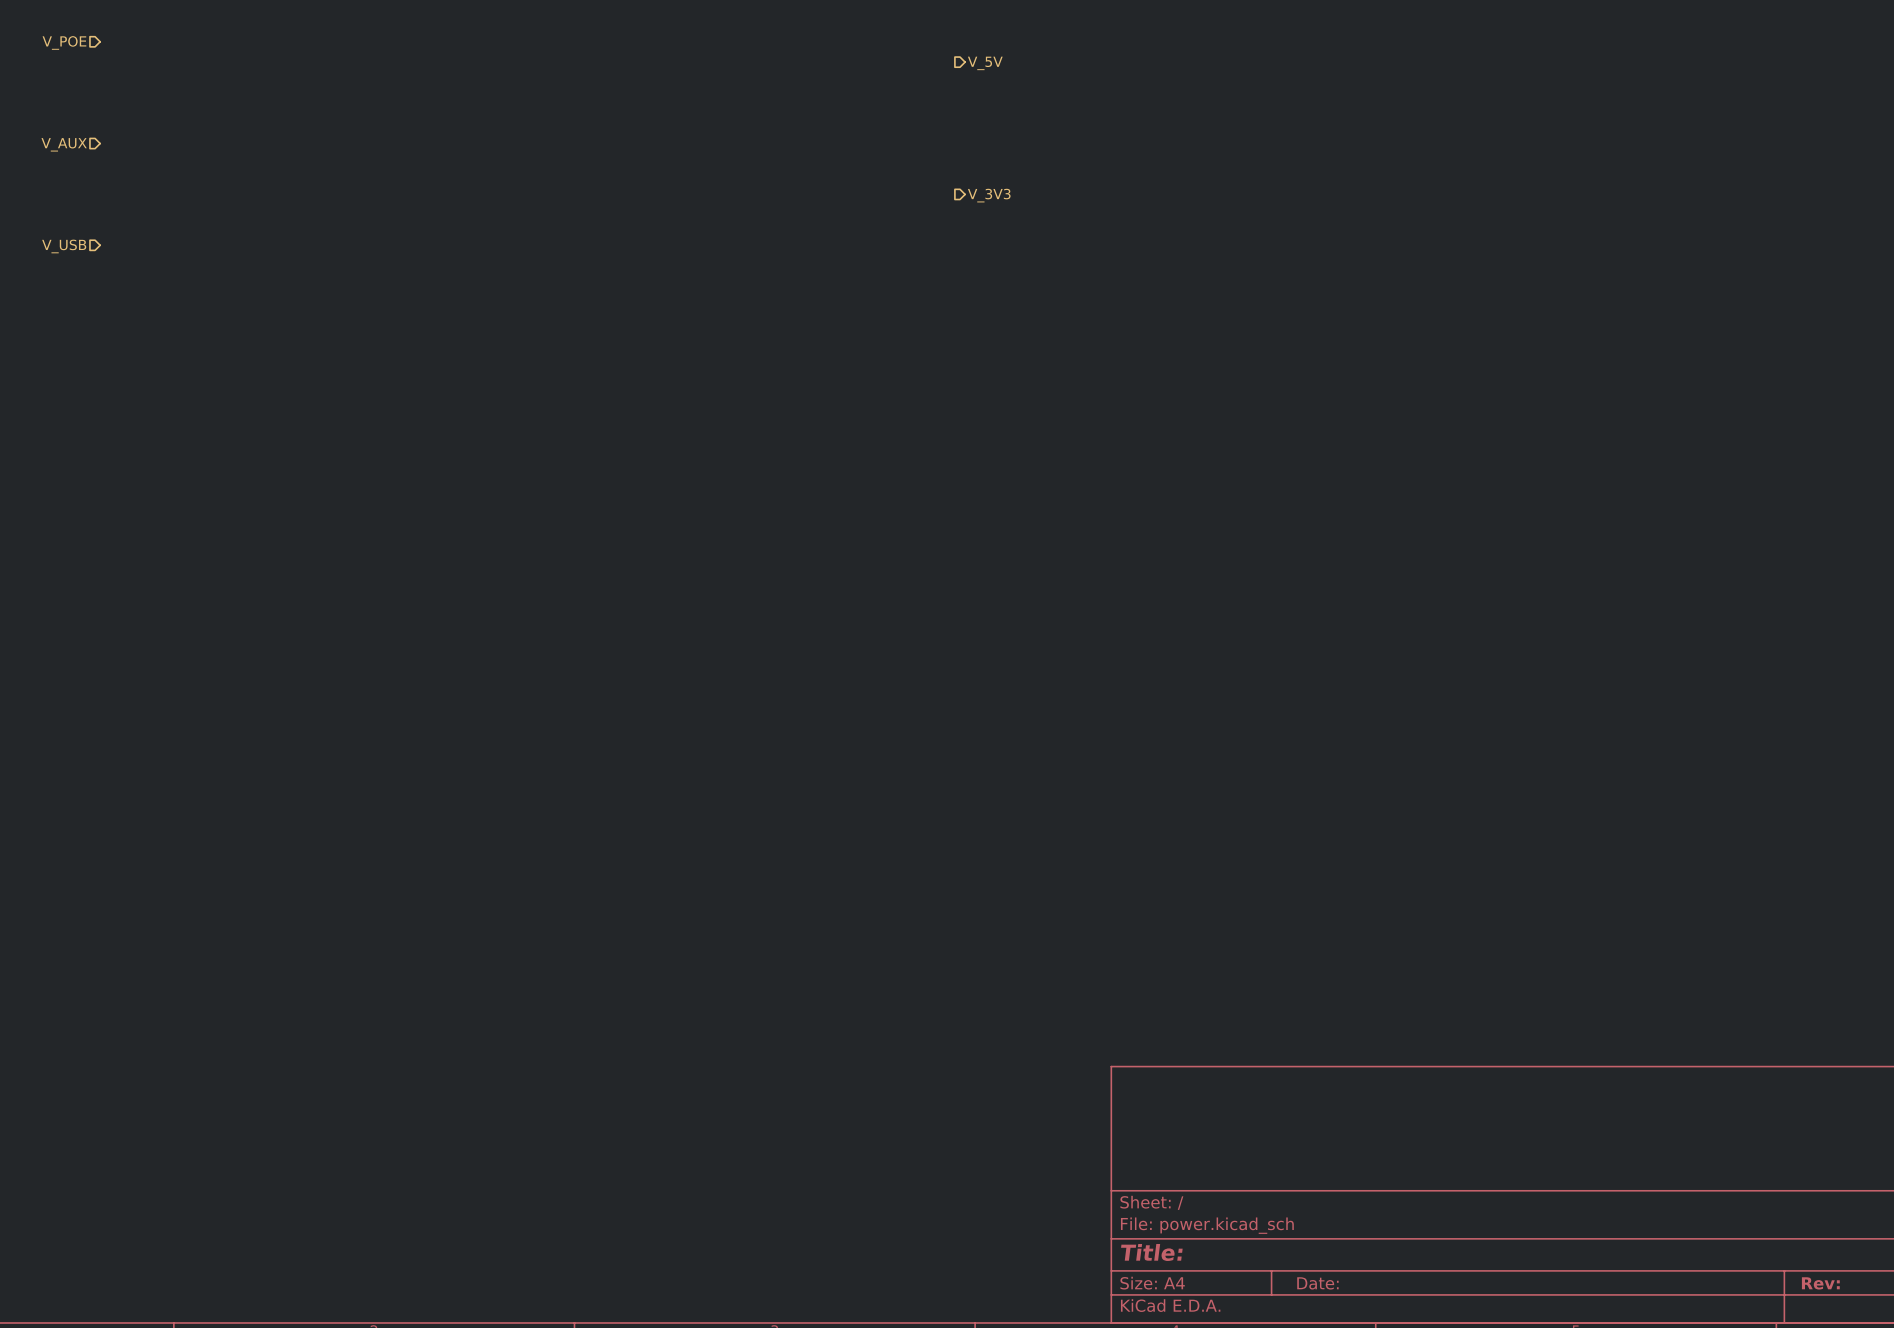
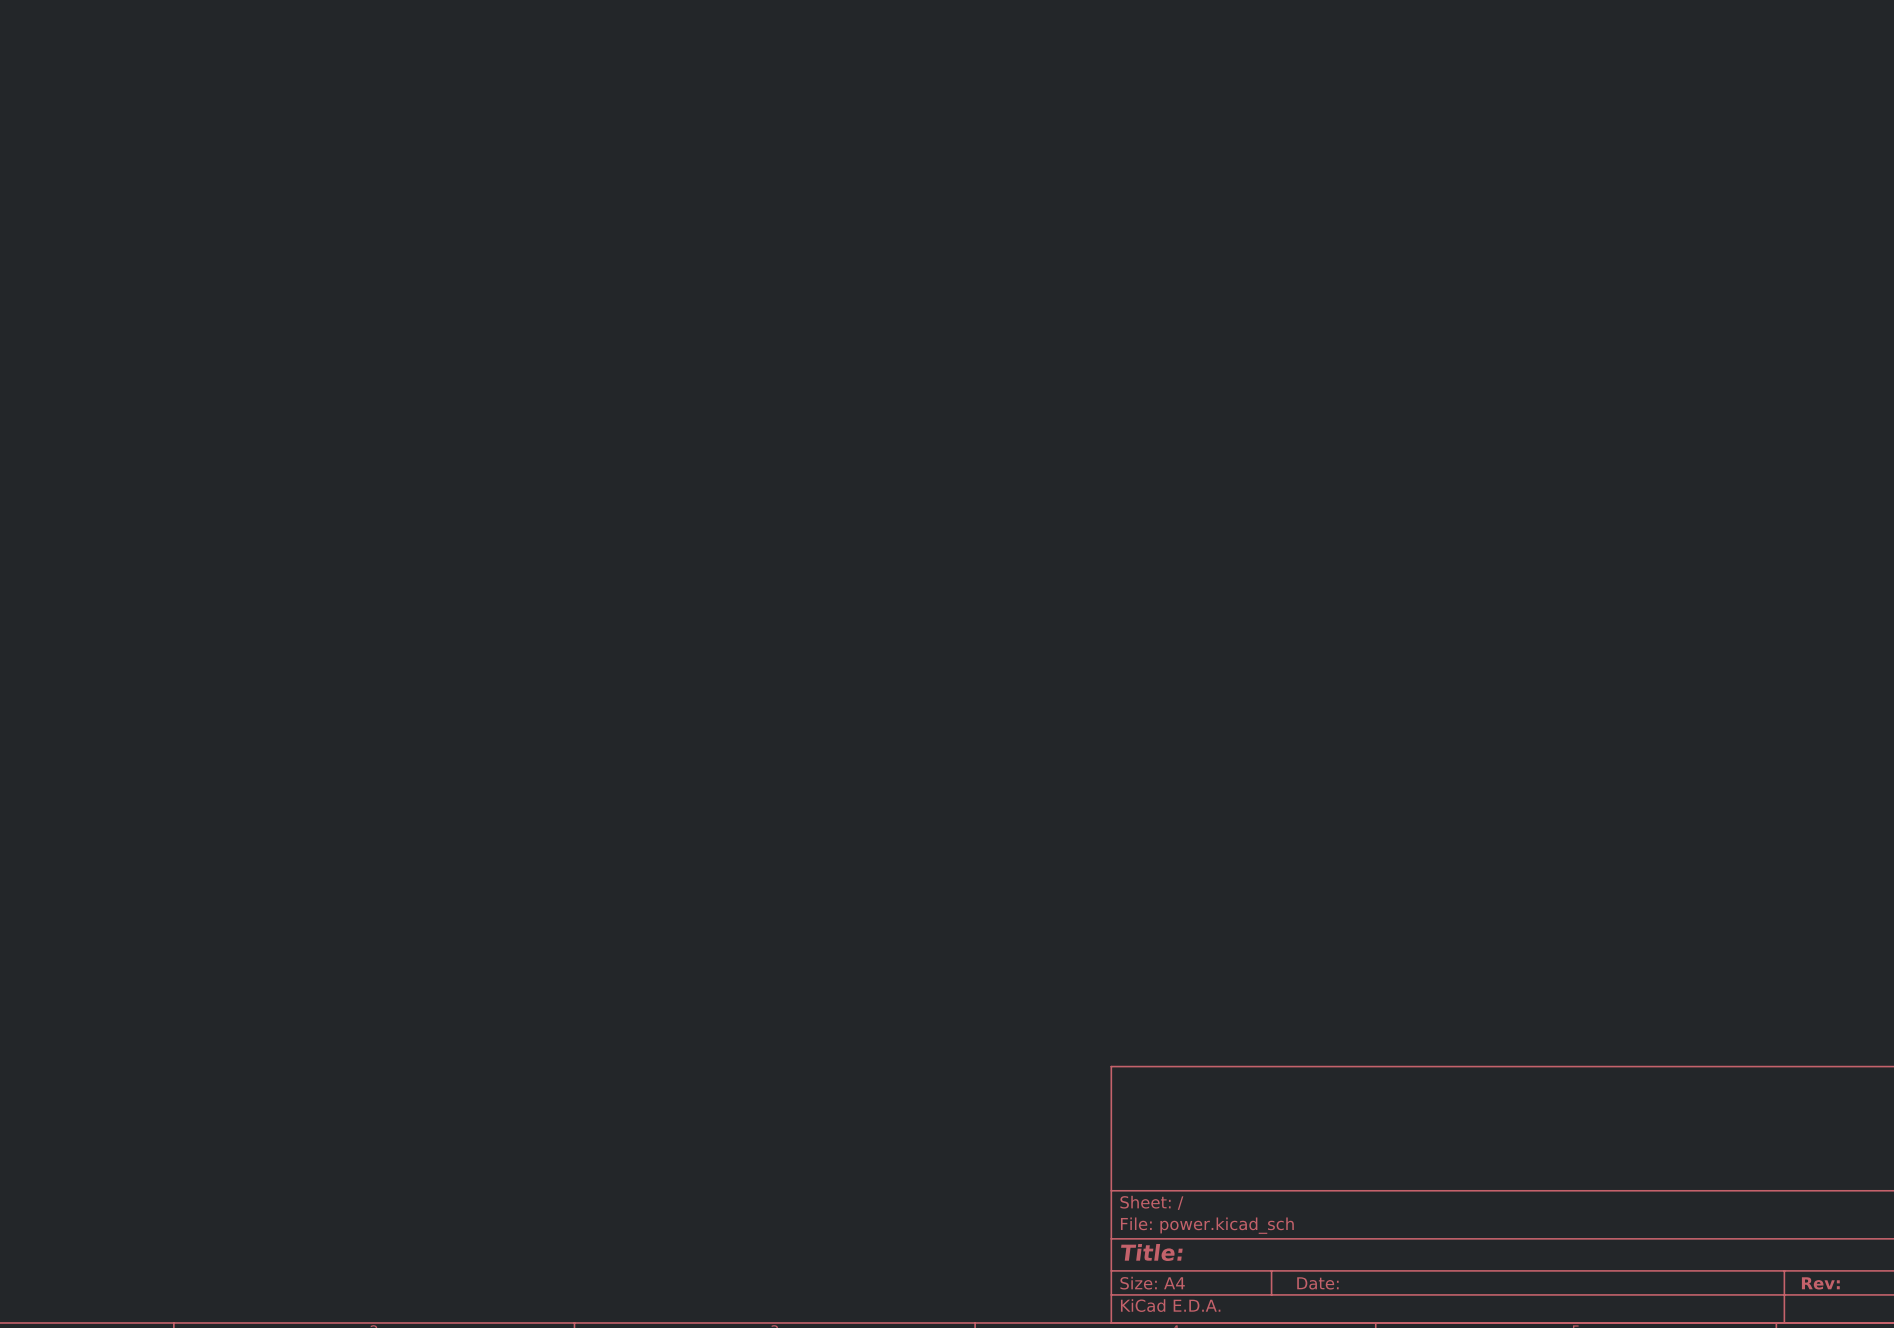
hierarchical label: V_POE (64, 42) -> none
hierarchical label: V_5V (985, 63) -> none
hierarchical label: V_AUX (64, 144) -> none
hierarchical label: V_3V3 (989, 195) -> none
hierarchical label: V_USB (64, 246) -> none

